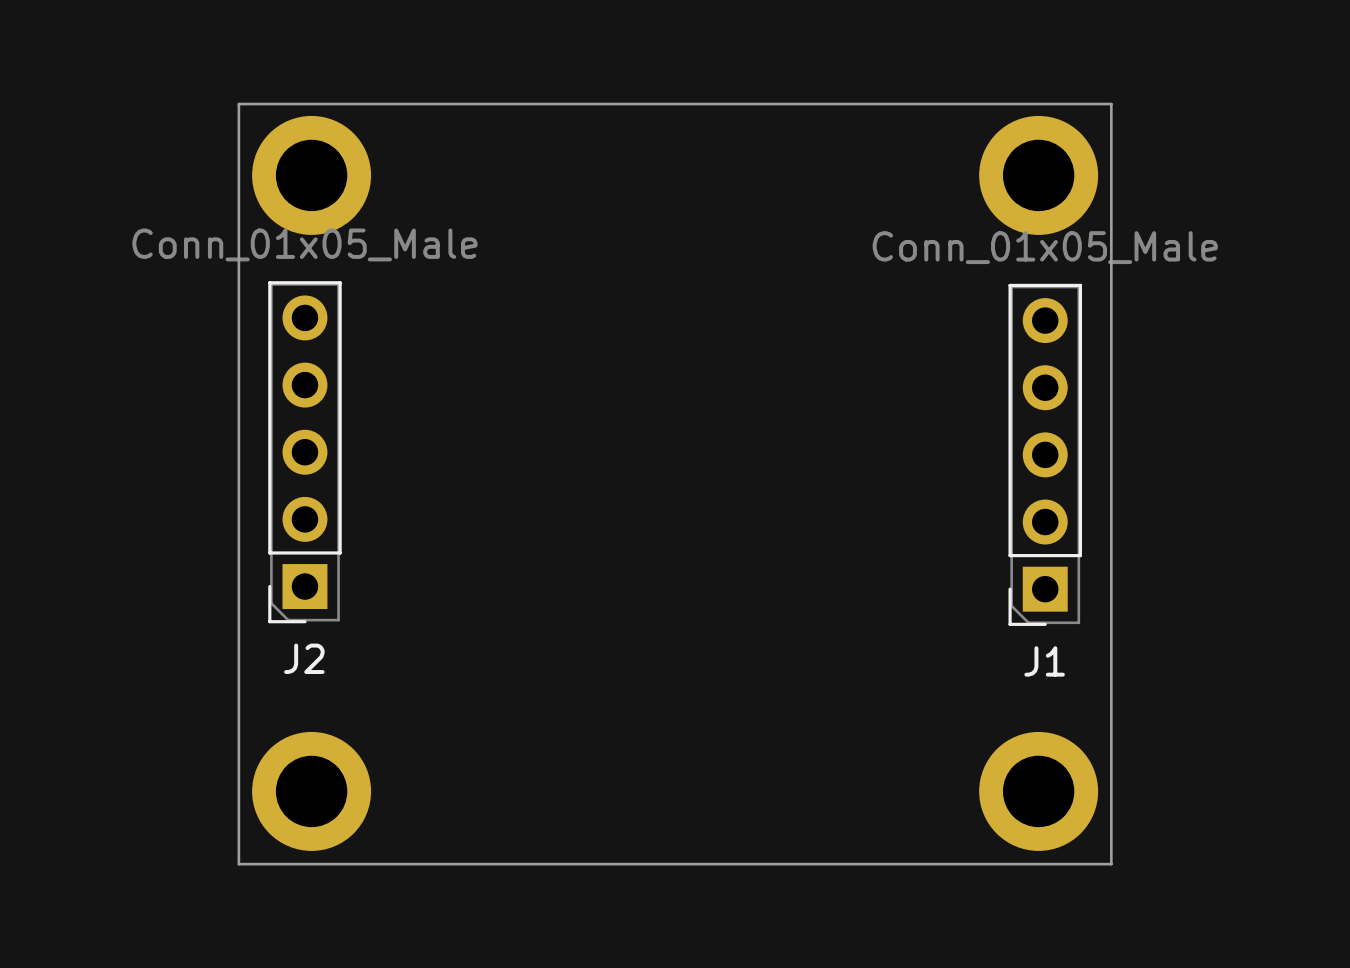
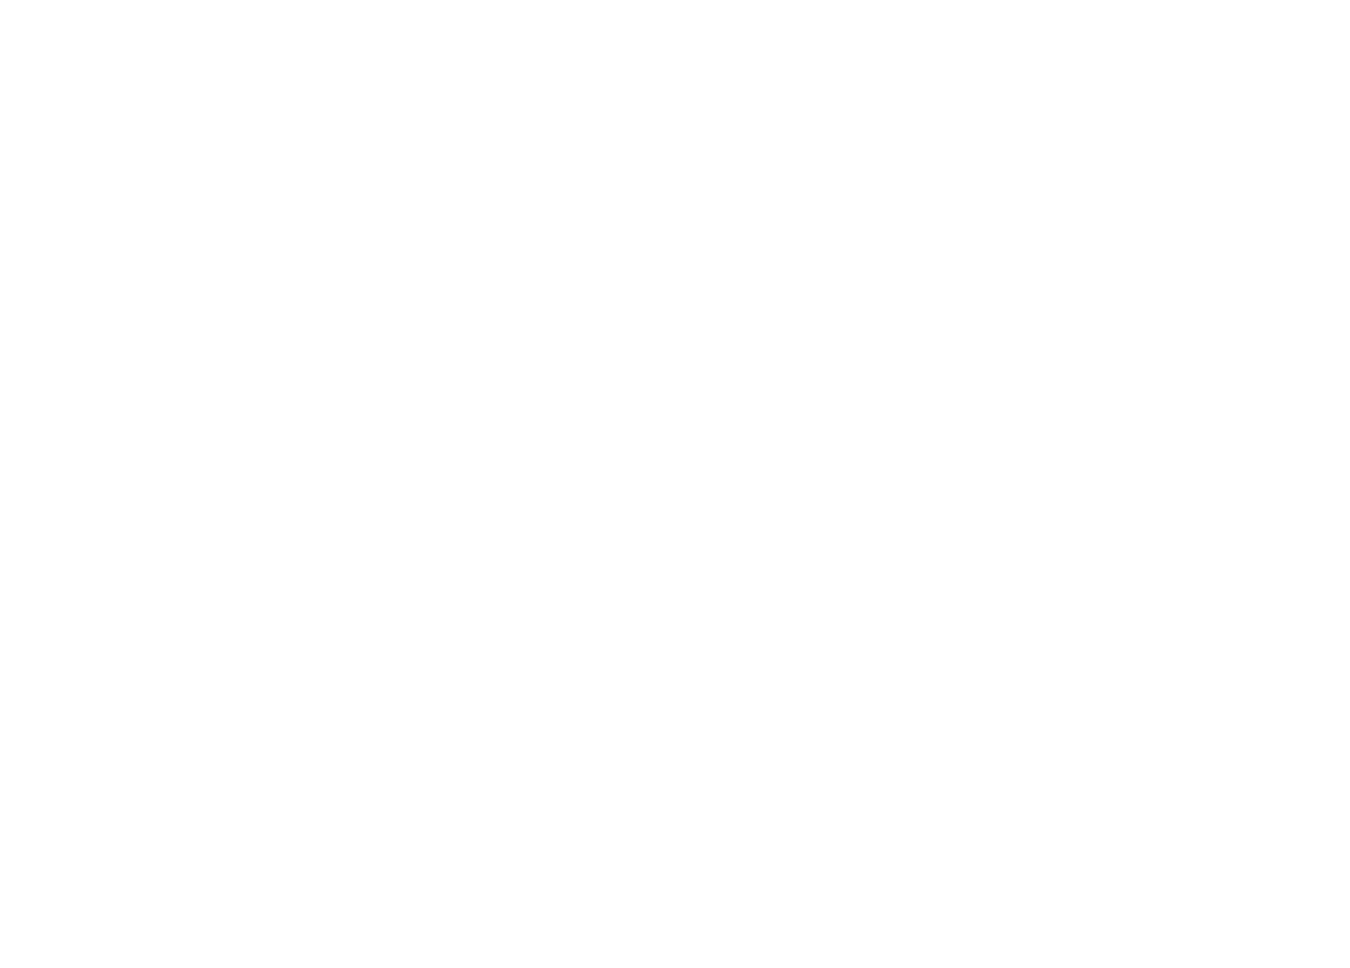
board edge: (1111, 104) (238, 104) (238, 864) (1111, 864) (1111, 104) -> none
part: (311, 175) -> none
part: (1038, 175) -> none
J2: Conn_01x05_Male (304, 452) -> none
J1: Conn_01x05_Male (1045, 454) -> none
part: (311, 791) -> none
part: (1038, 791) -> none

